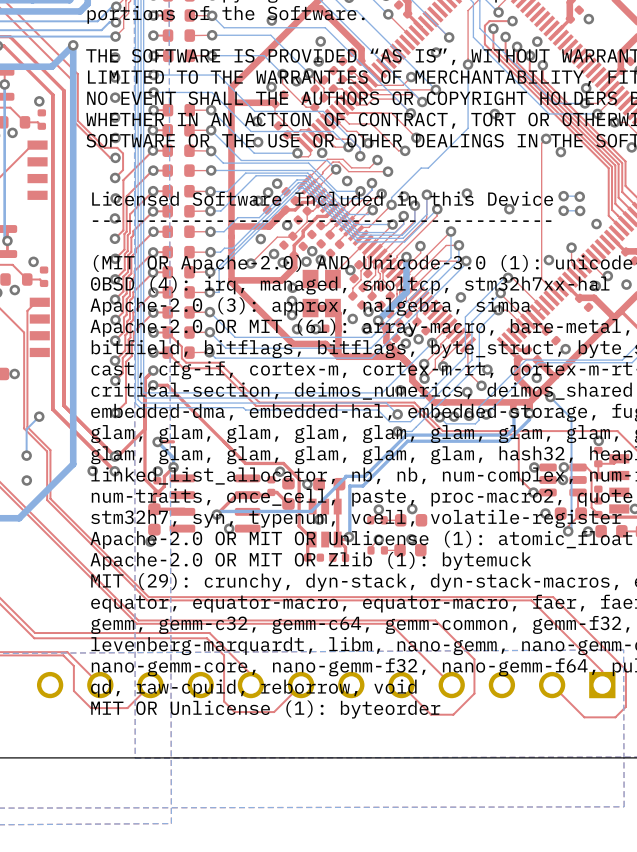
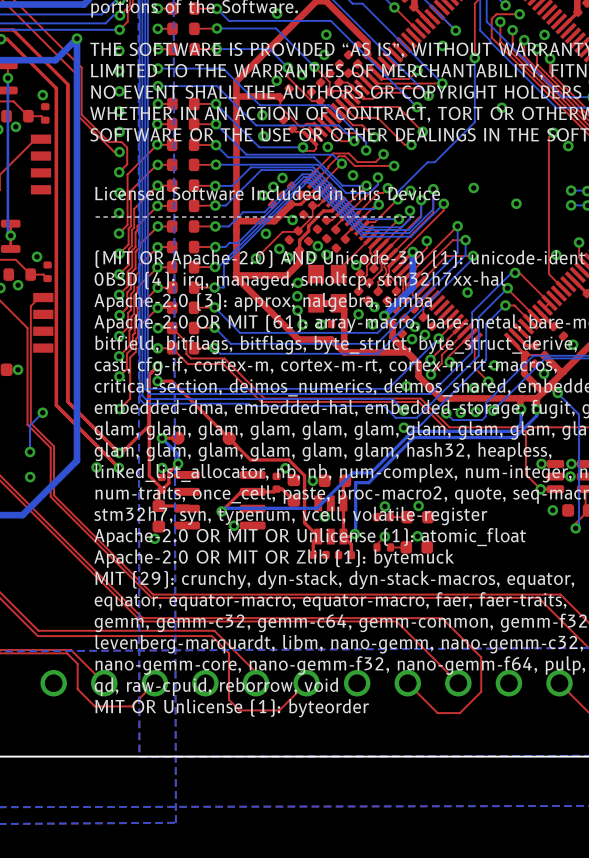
part: none -> (177, 438)
part: none -> (229, 438)

